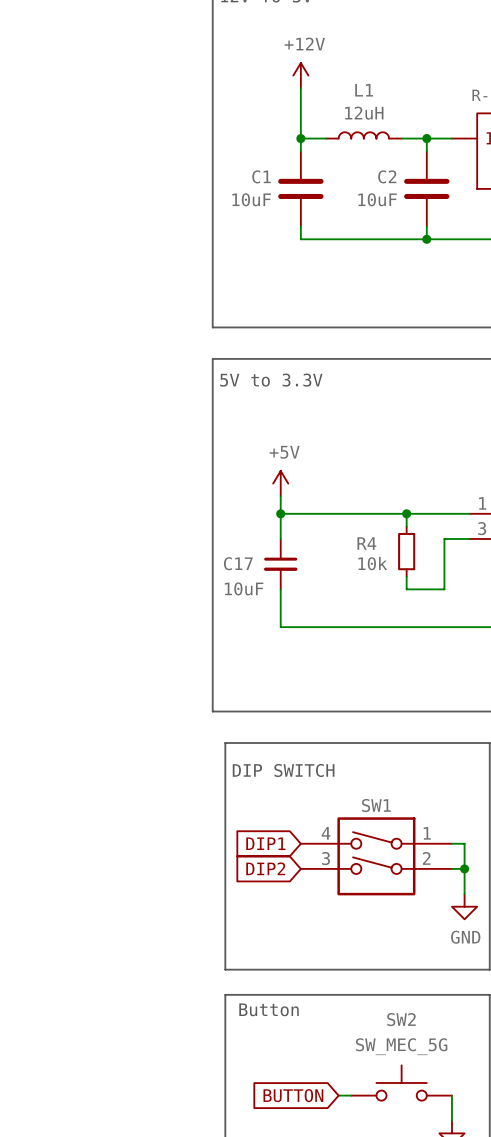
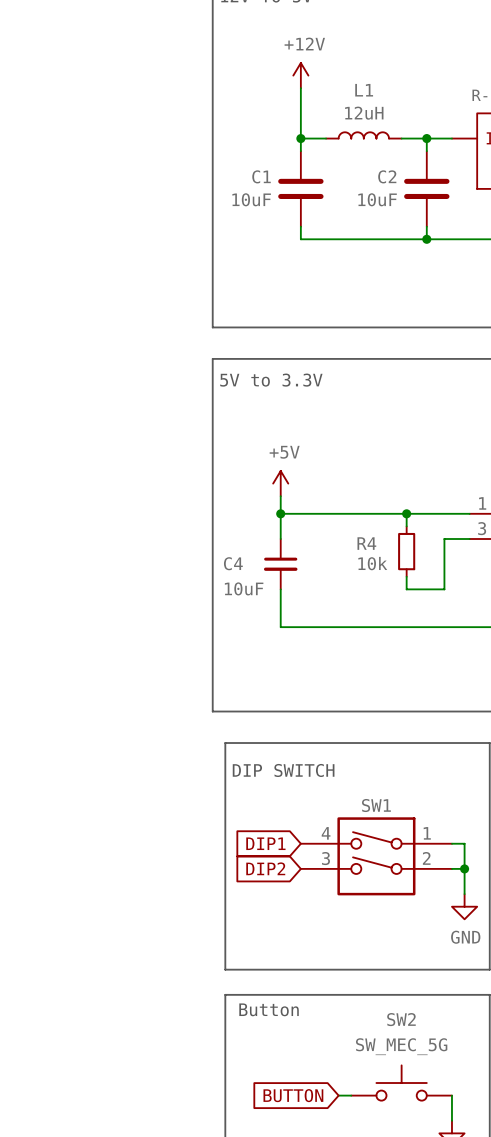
C17 name: C17 (238, 563) -> C4 (233, 563)

